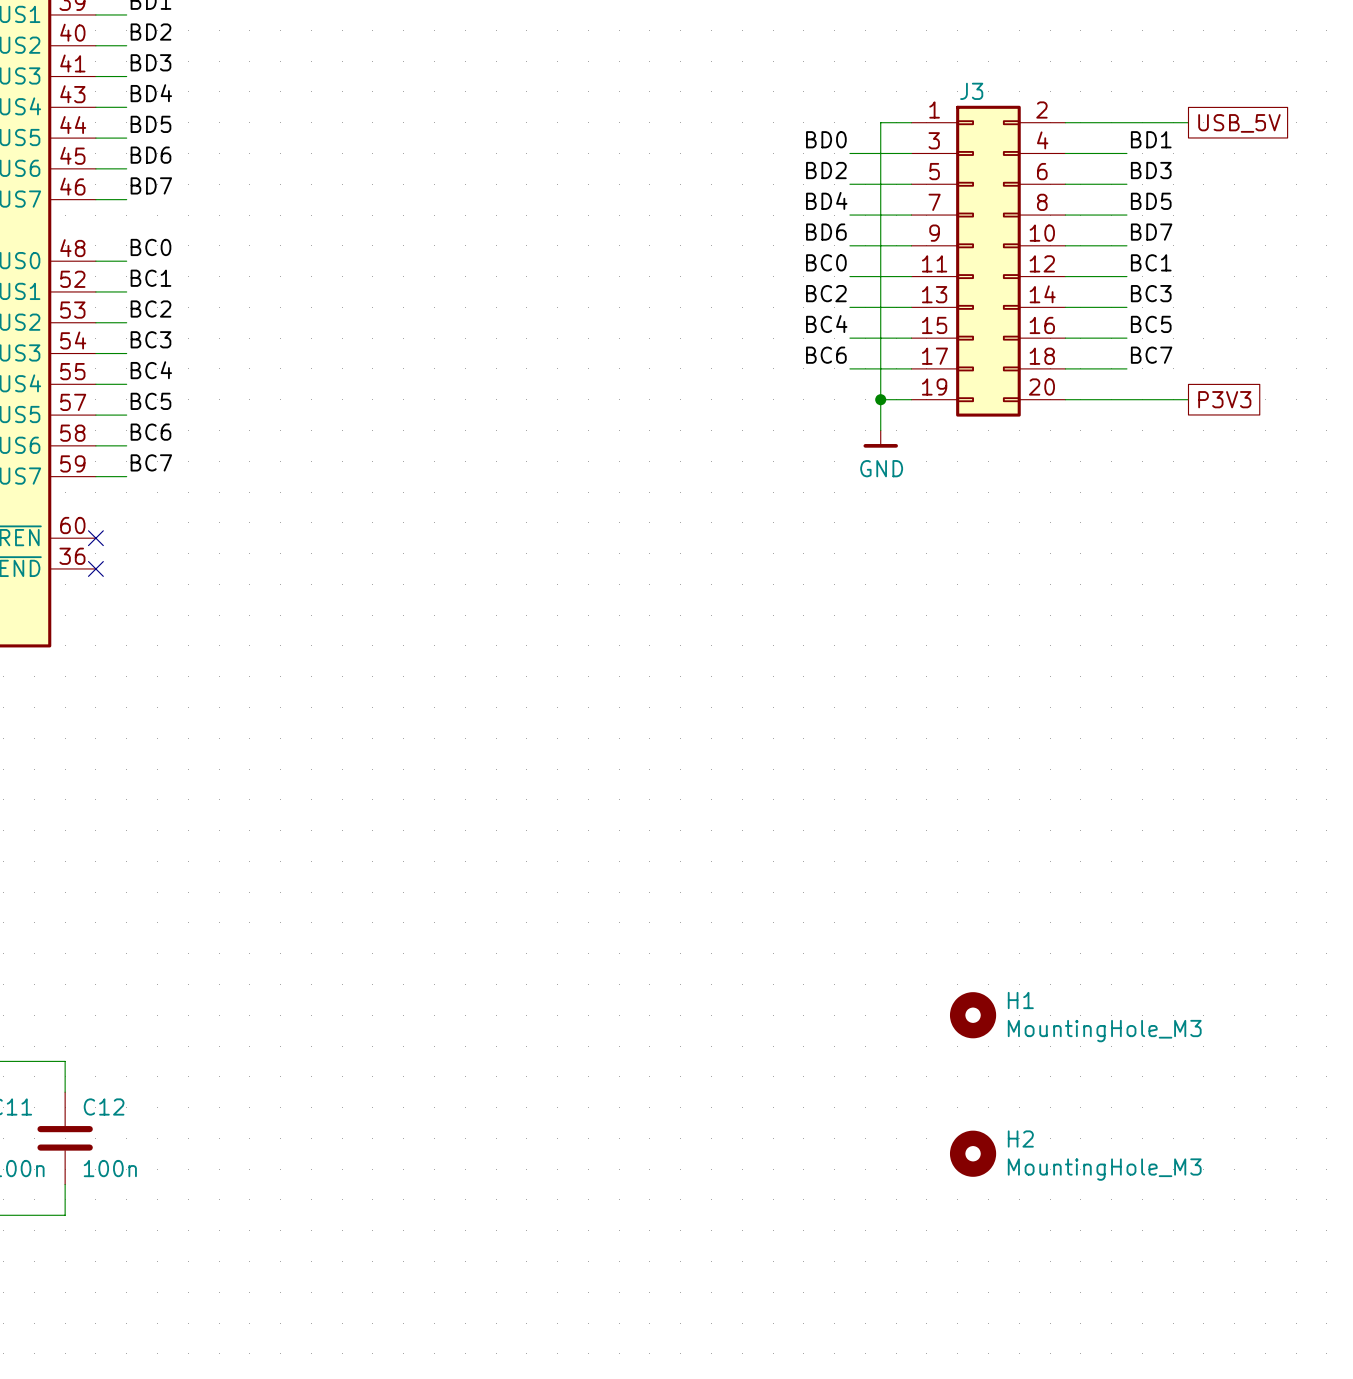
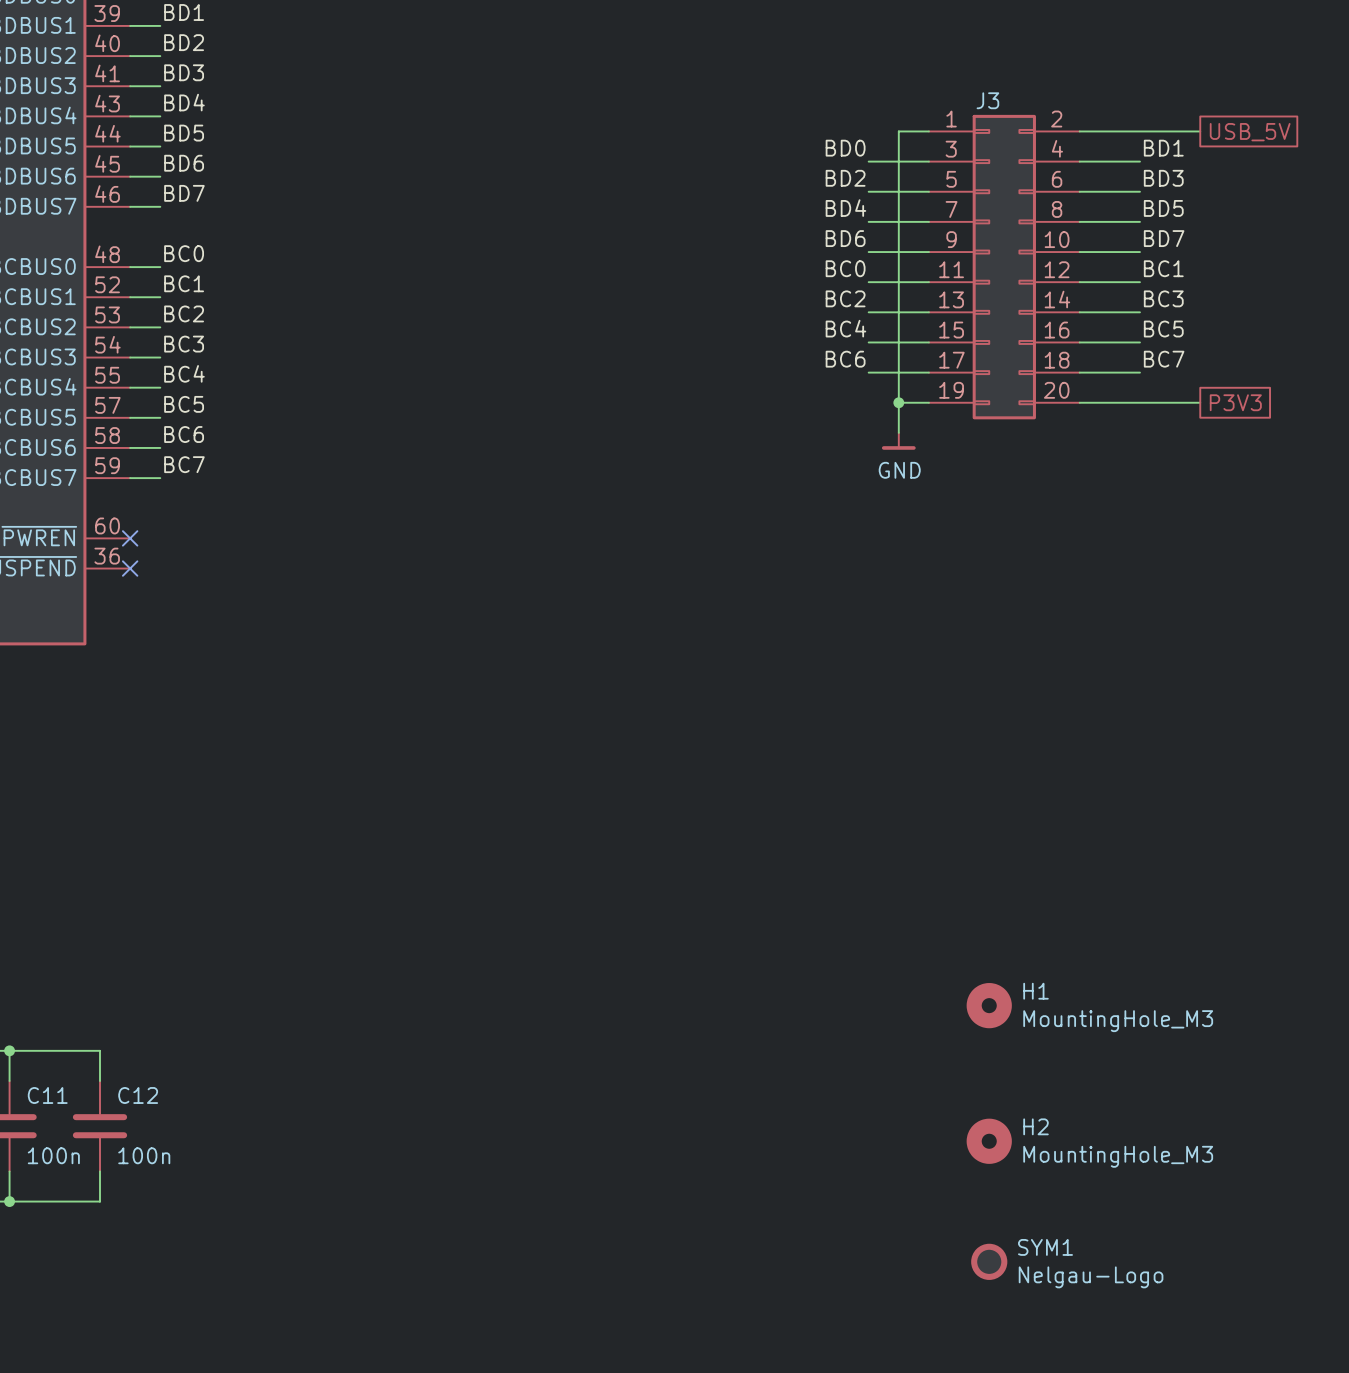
SYM1: none -> Nelgau-Logo (989, 1261)

